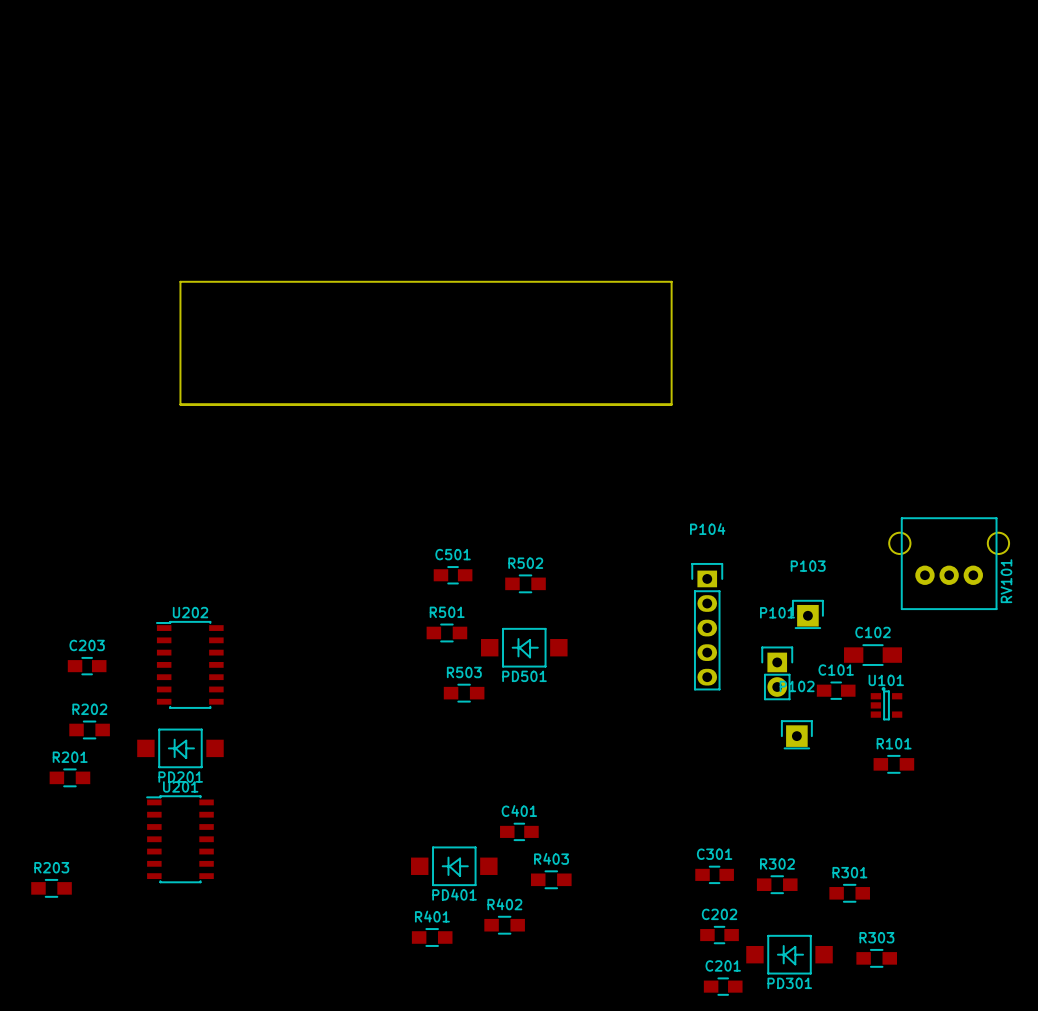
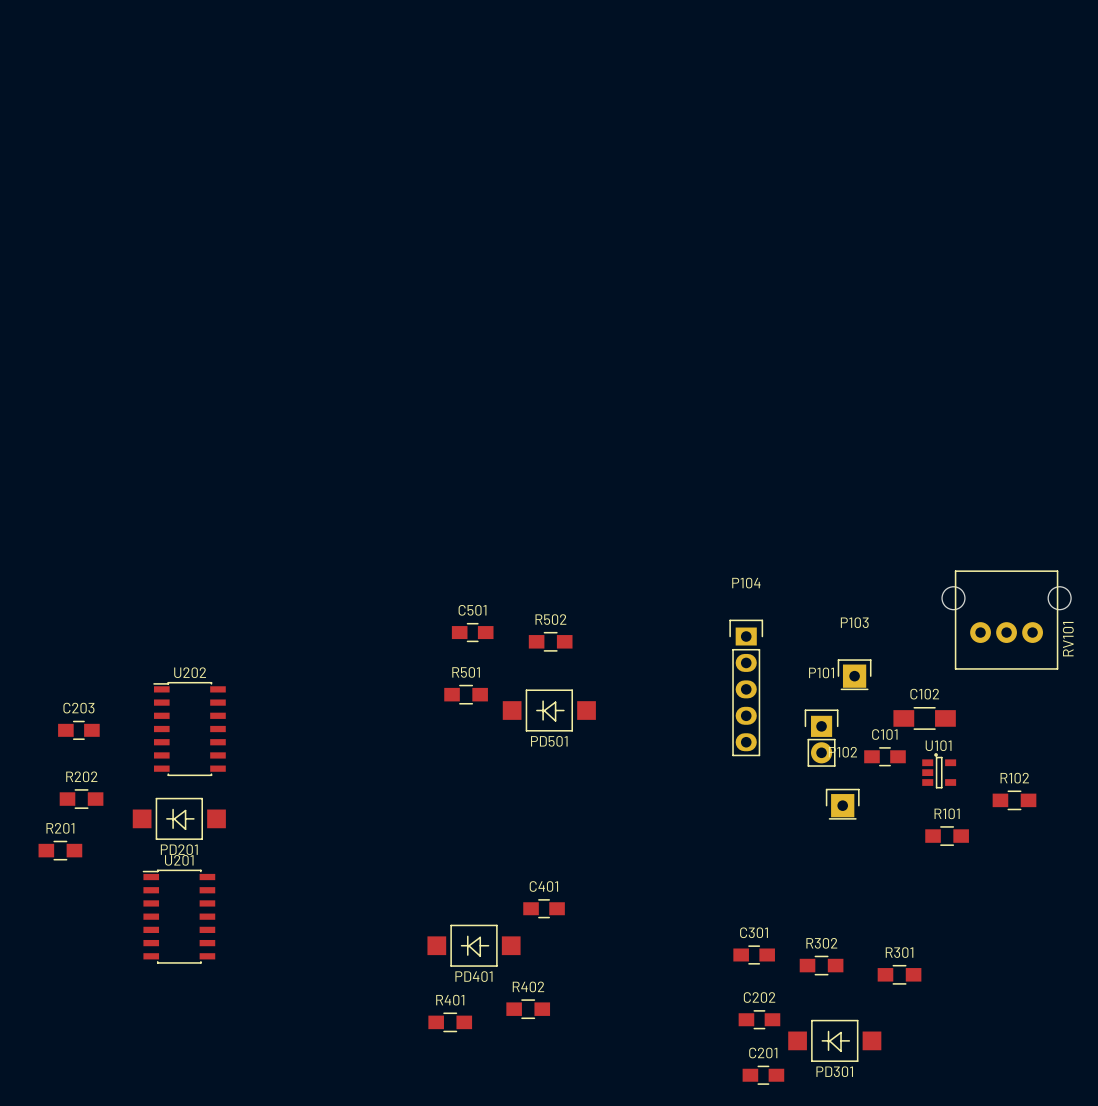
board edge: (180, 281) (180, 404) (671, 404) (671, 281) (180, 281) -> none
R503: (464, 693) -> none
R102: none -> (1014, 800)
R403: (551, 879) -> none
R203: (51, 888) -> none
R303: (876, 958) -> none

